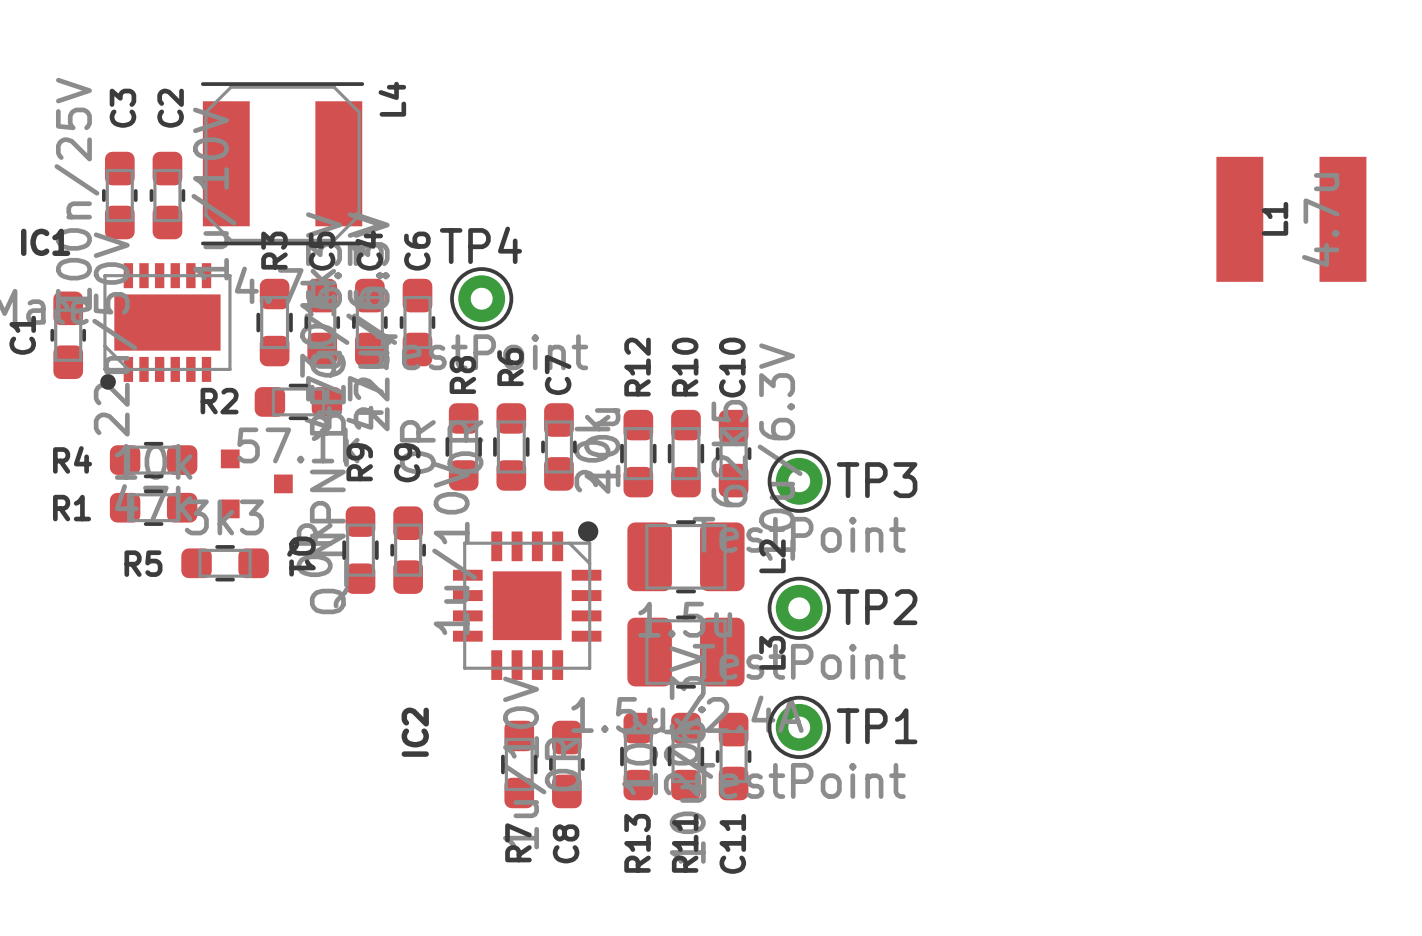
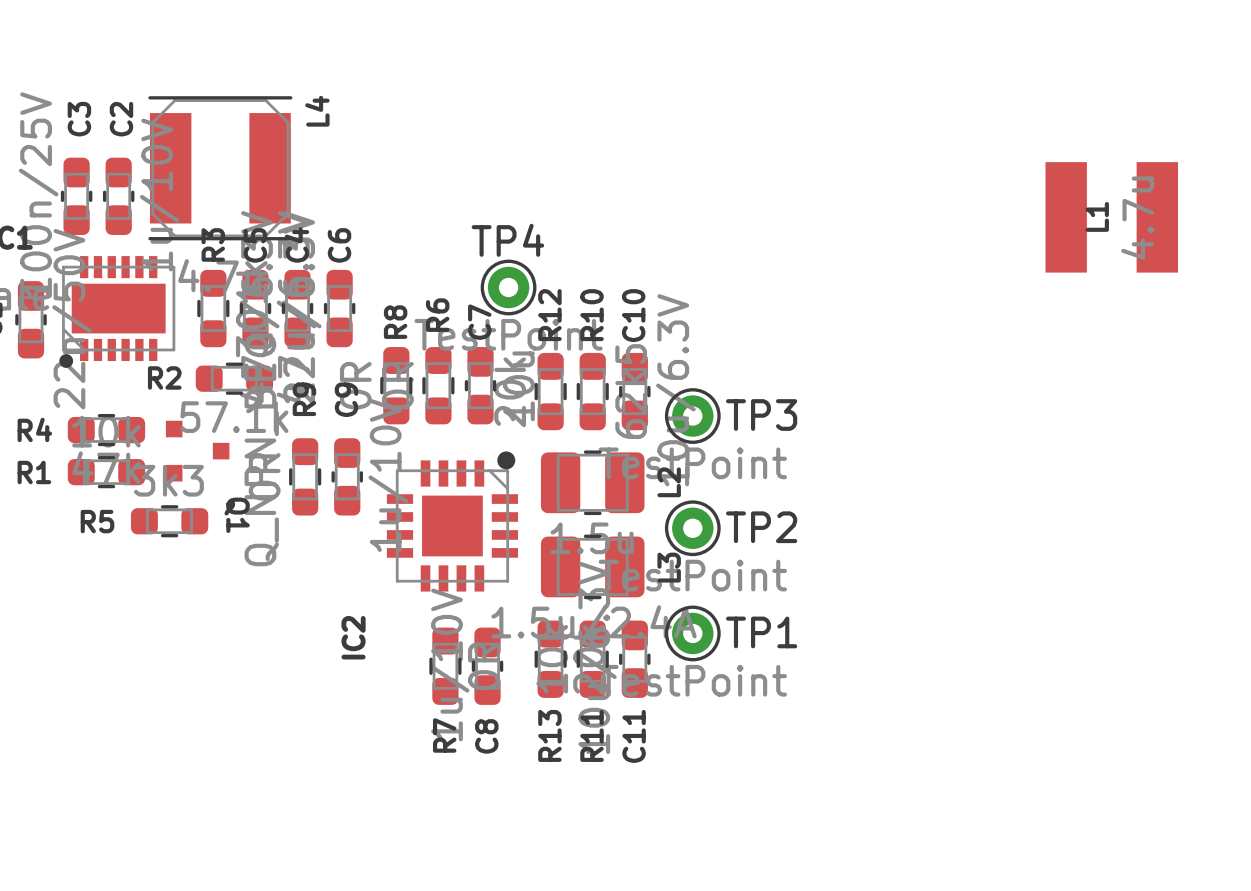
TP4 position: (481, 298) -> (508, 287)
R8 position: (463, 446) -> (396, 385)
R6 position: (511, 446) -> (438, 385)
C7 position: (558, 446) -> (480, 385)
R12 position: (638, 453) -> (550, 391)
R10 position: (685, 453) -> (592, 391)
C10 position: (733, 453) -> (634, 391)
TP3 position: (799, 481) -> (692, 416)
R9 position: (360, 550) -> (305, 476)
C9 position: (408, 550) -> (347, 476)
L2 position: (685, 556) -> (592, 482)
IC2 position: (527, 600) -> (452, 521)
TP2 position: (799, 608) -> (692, 528)
L3 position: (685, 652) -> (592, 566)
TP1 position: (799, 727) -> (692, 633)
R13 position: (638, 756) -> (550, 659)
R11 position: (685, 756) -> (592, 659)
C11 position: (733, 756) -> (634, 659)
R7 position: (519, 764) -> (445, 666)
C8 position: (566, 764) -> (487, 666)

